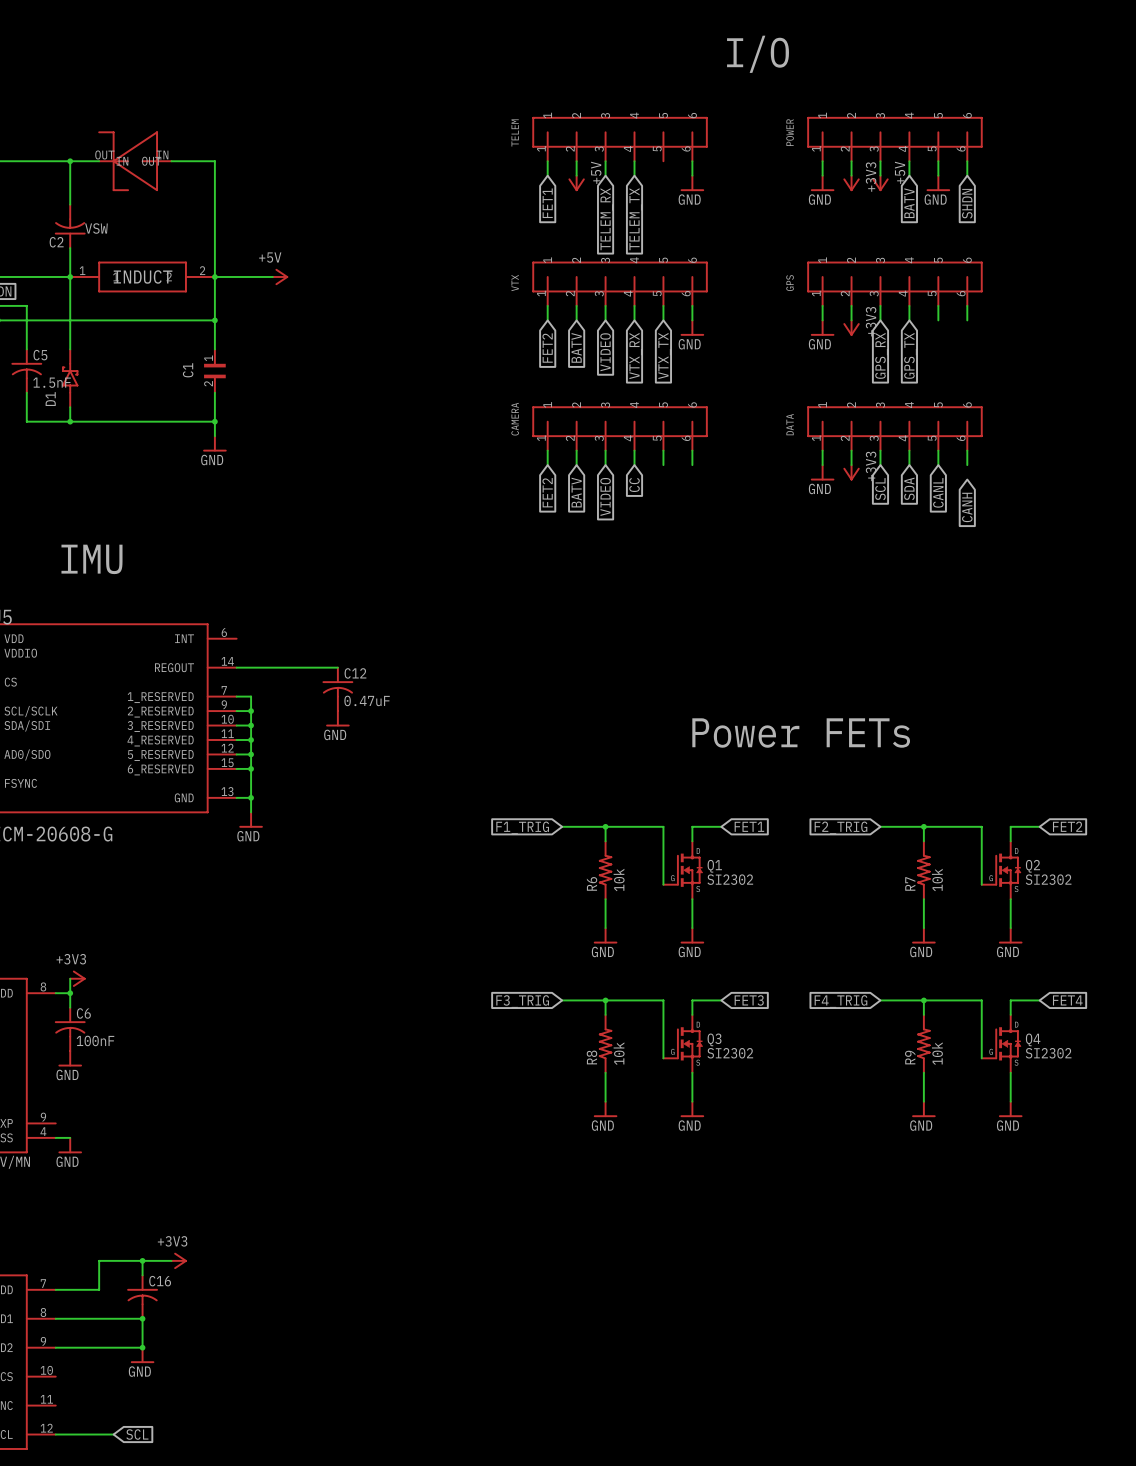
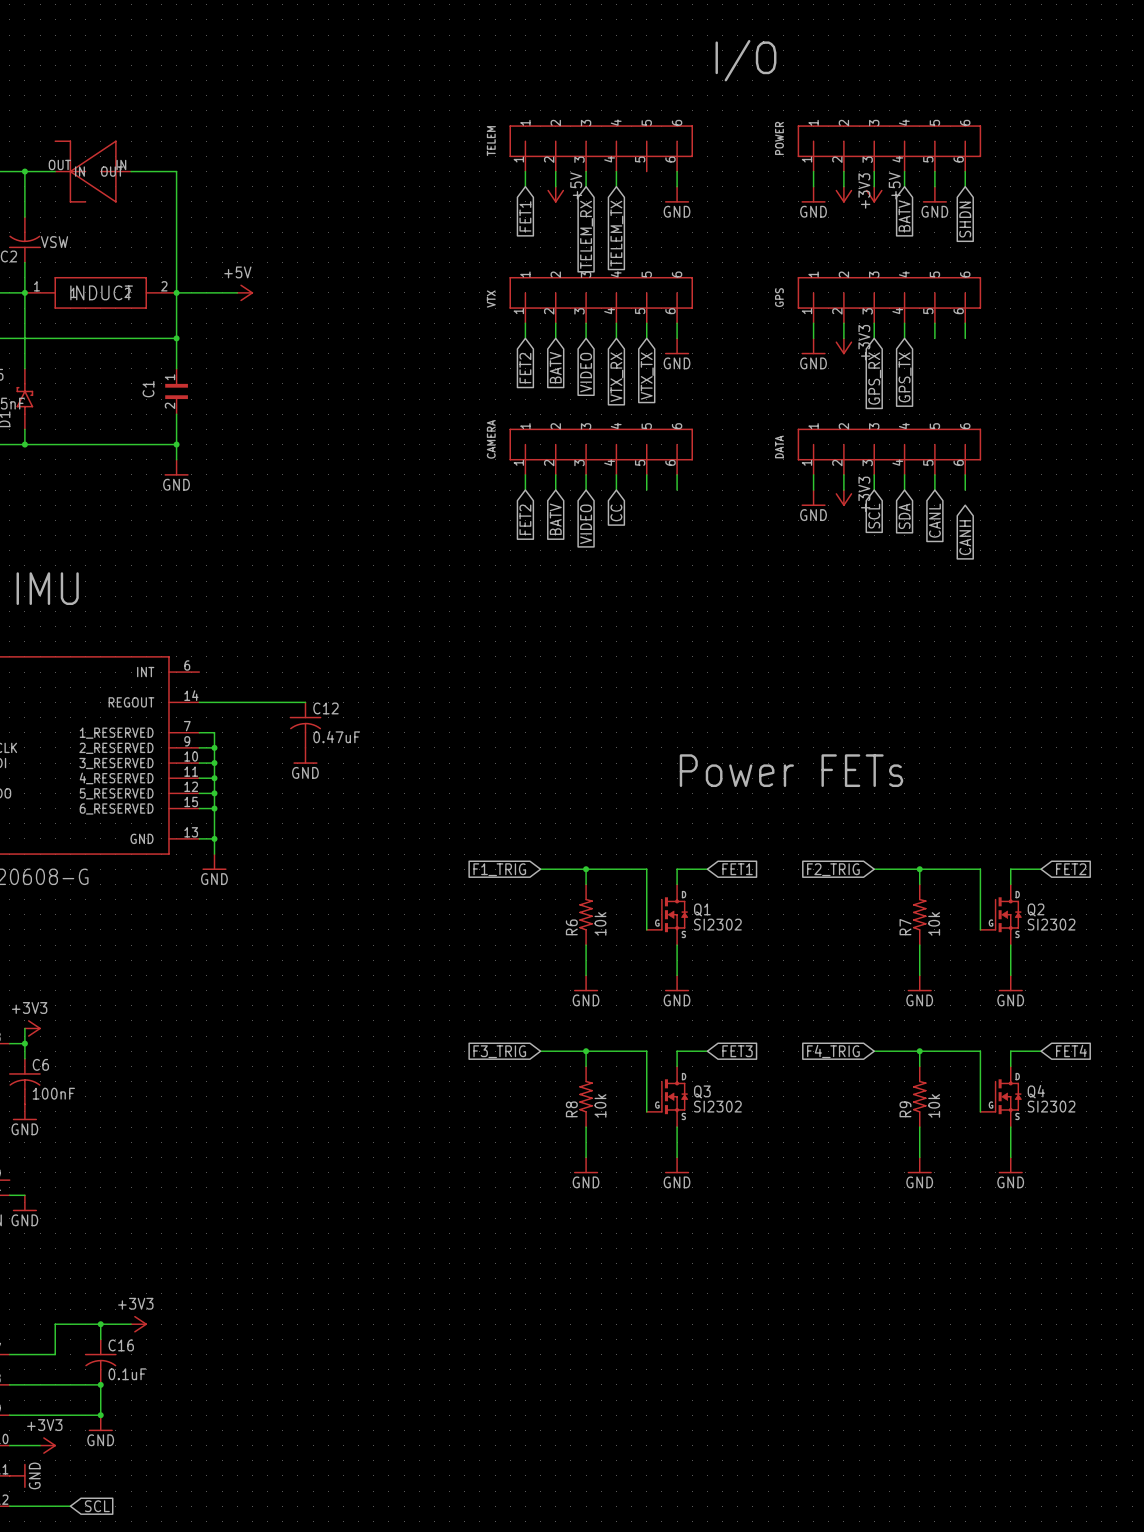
C16 value: none -> 0.1uF (127, 1374)
wire: none -> (9, 1445) (40, 1445)
power symbol: none -> +3V3 (48, 1445)
power symbol: none -> GND (17, 1475)

